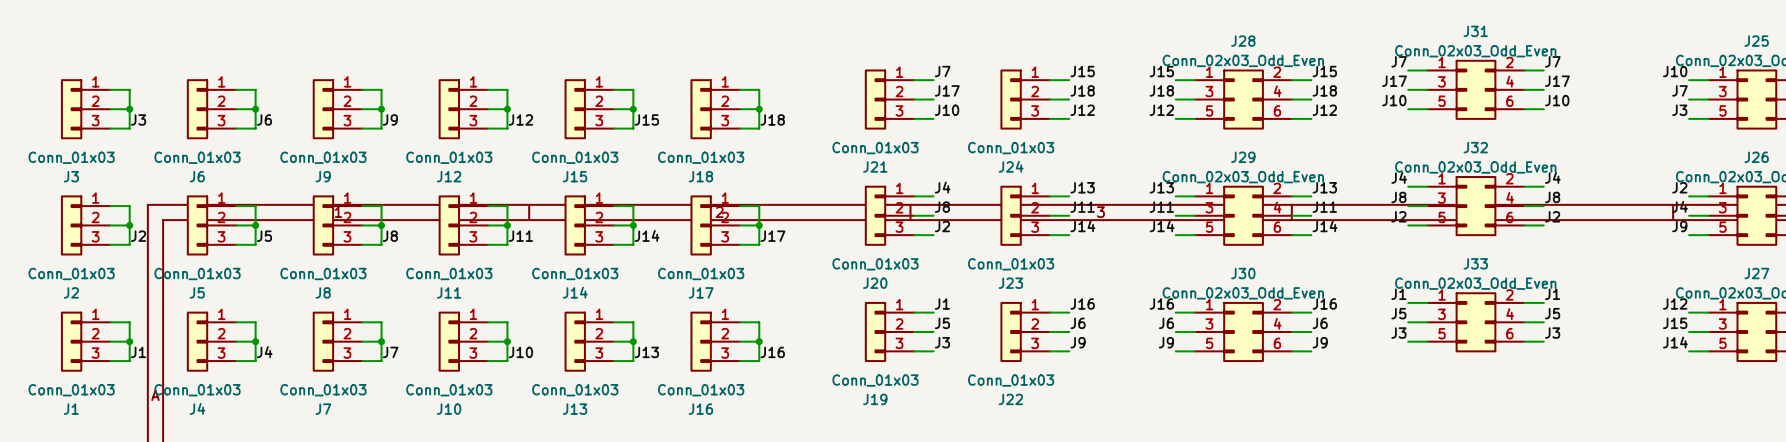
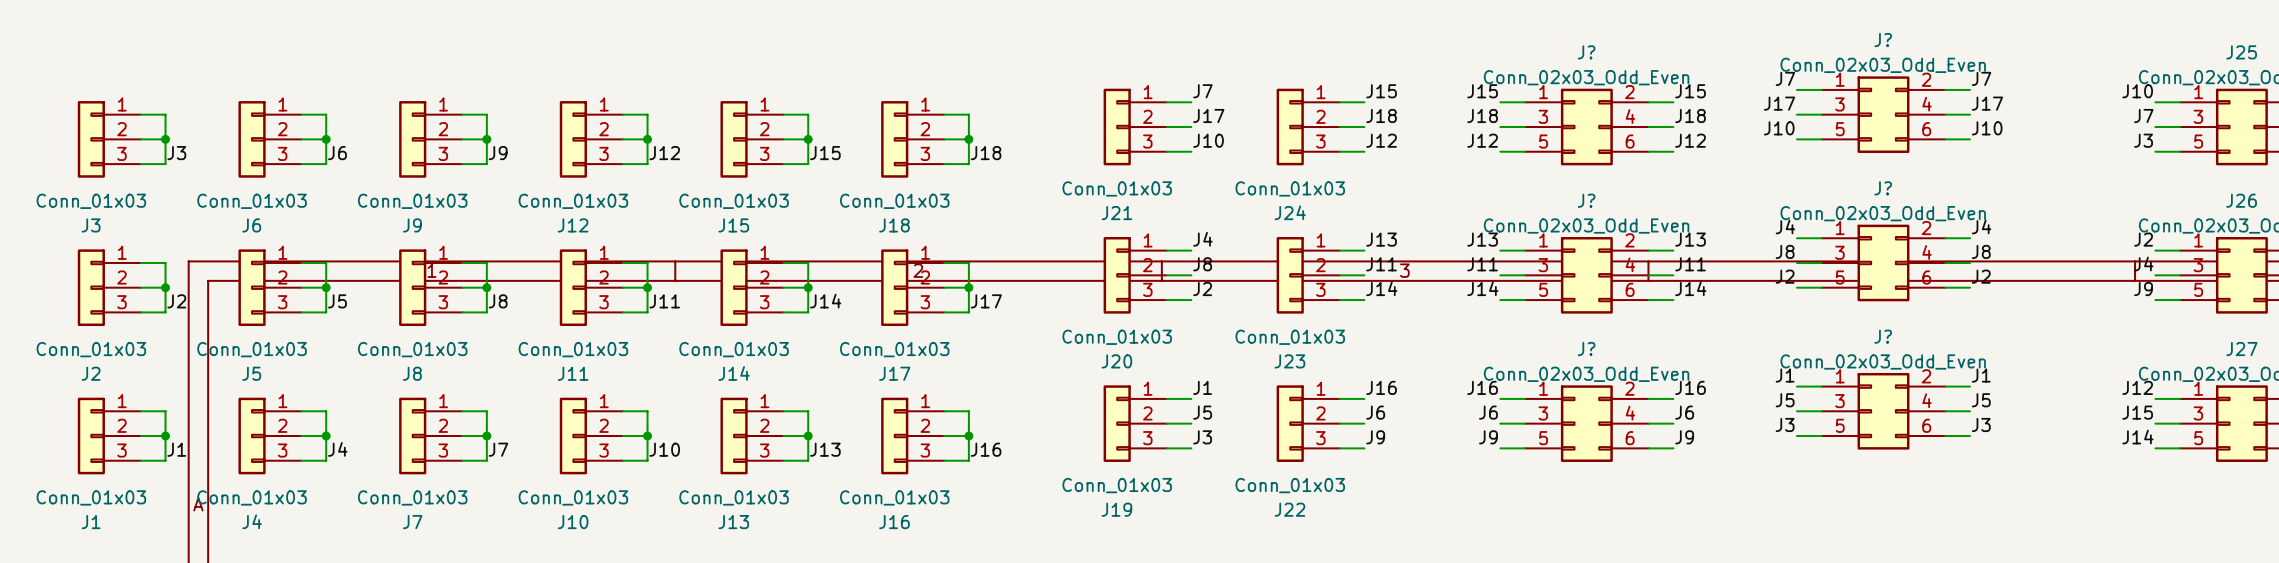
J31 name: J31 (1475, 31) -> J? (1883, 40)
J28 name: J28 (1243, 41) -> J? (1586, 52)
J32 name: J32 (1475, 147) -> J? (1883, 188)
J29 name: J29 (1243, 157) -> J? (1586, 200)
J33 name: J33 (1475, 263) -> J? (1883, 336)
J30 name: J30 (1243, 273) -> J? (1586, 349)

